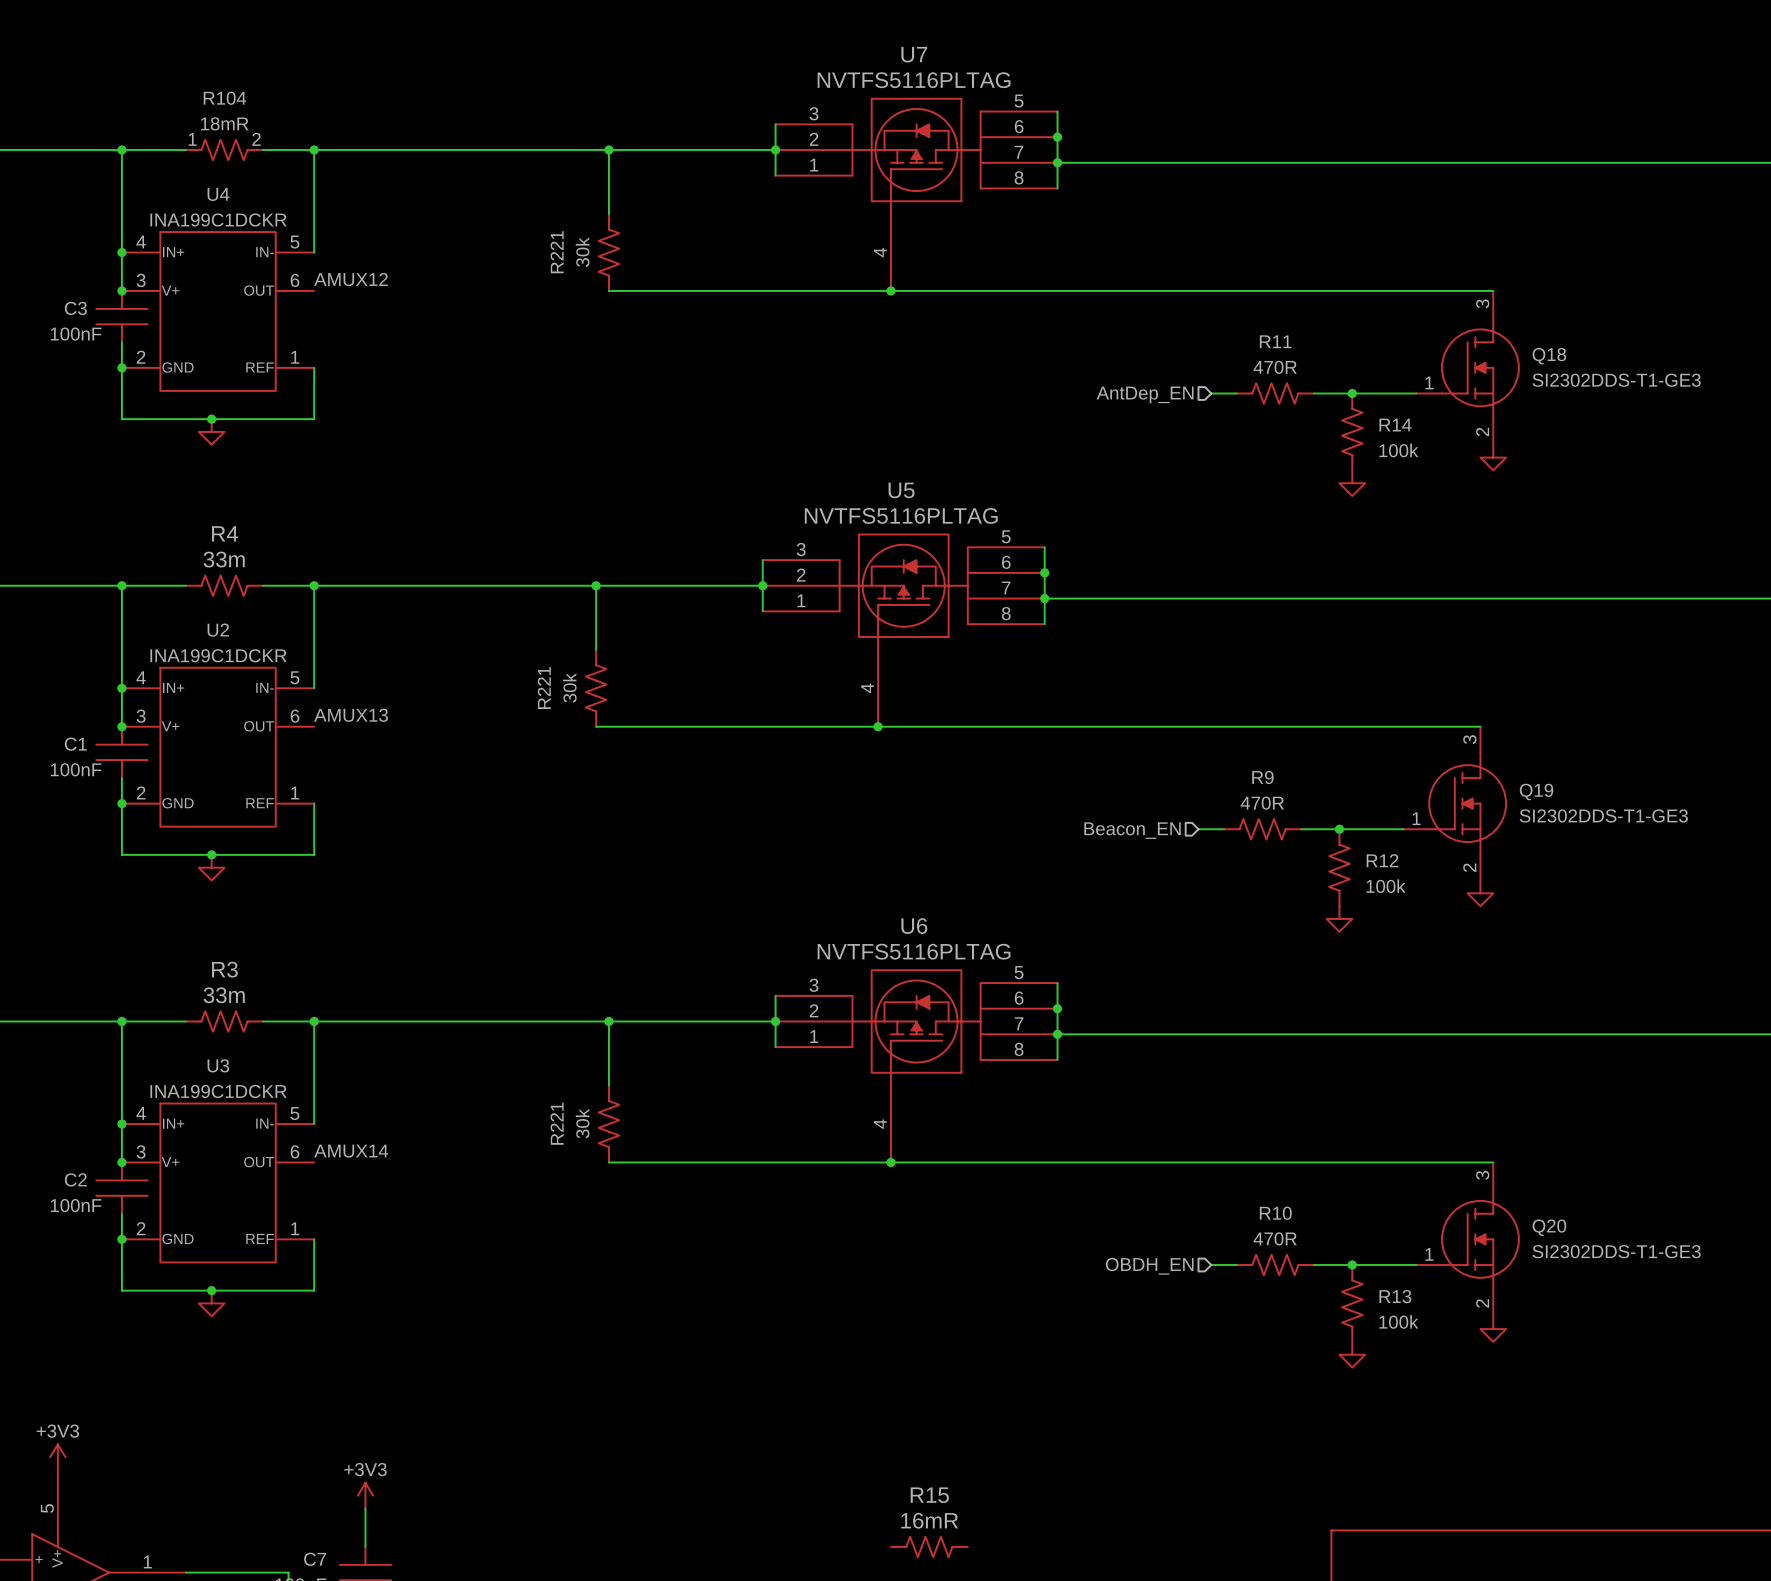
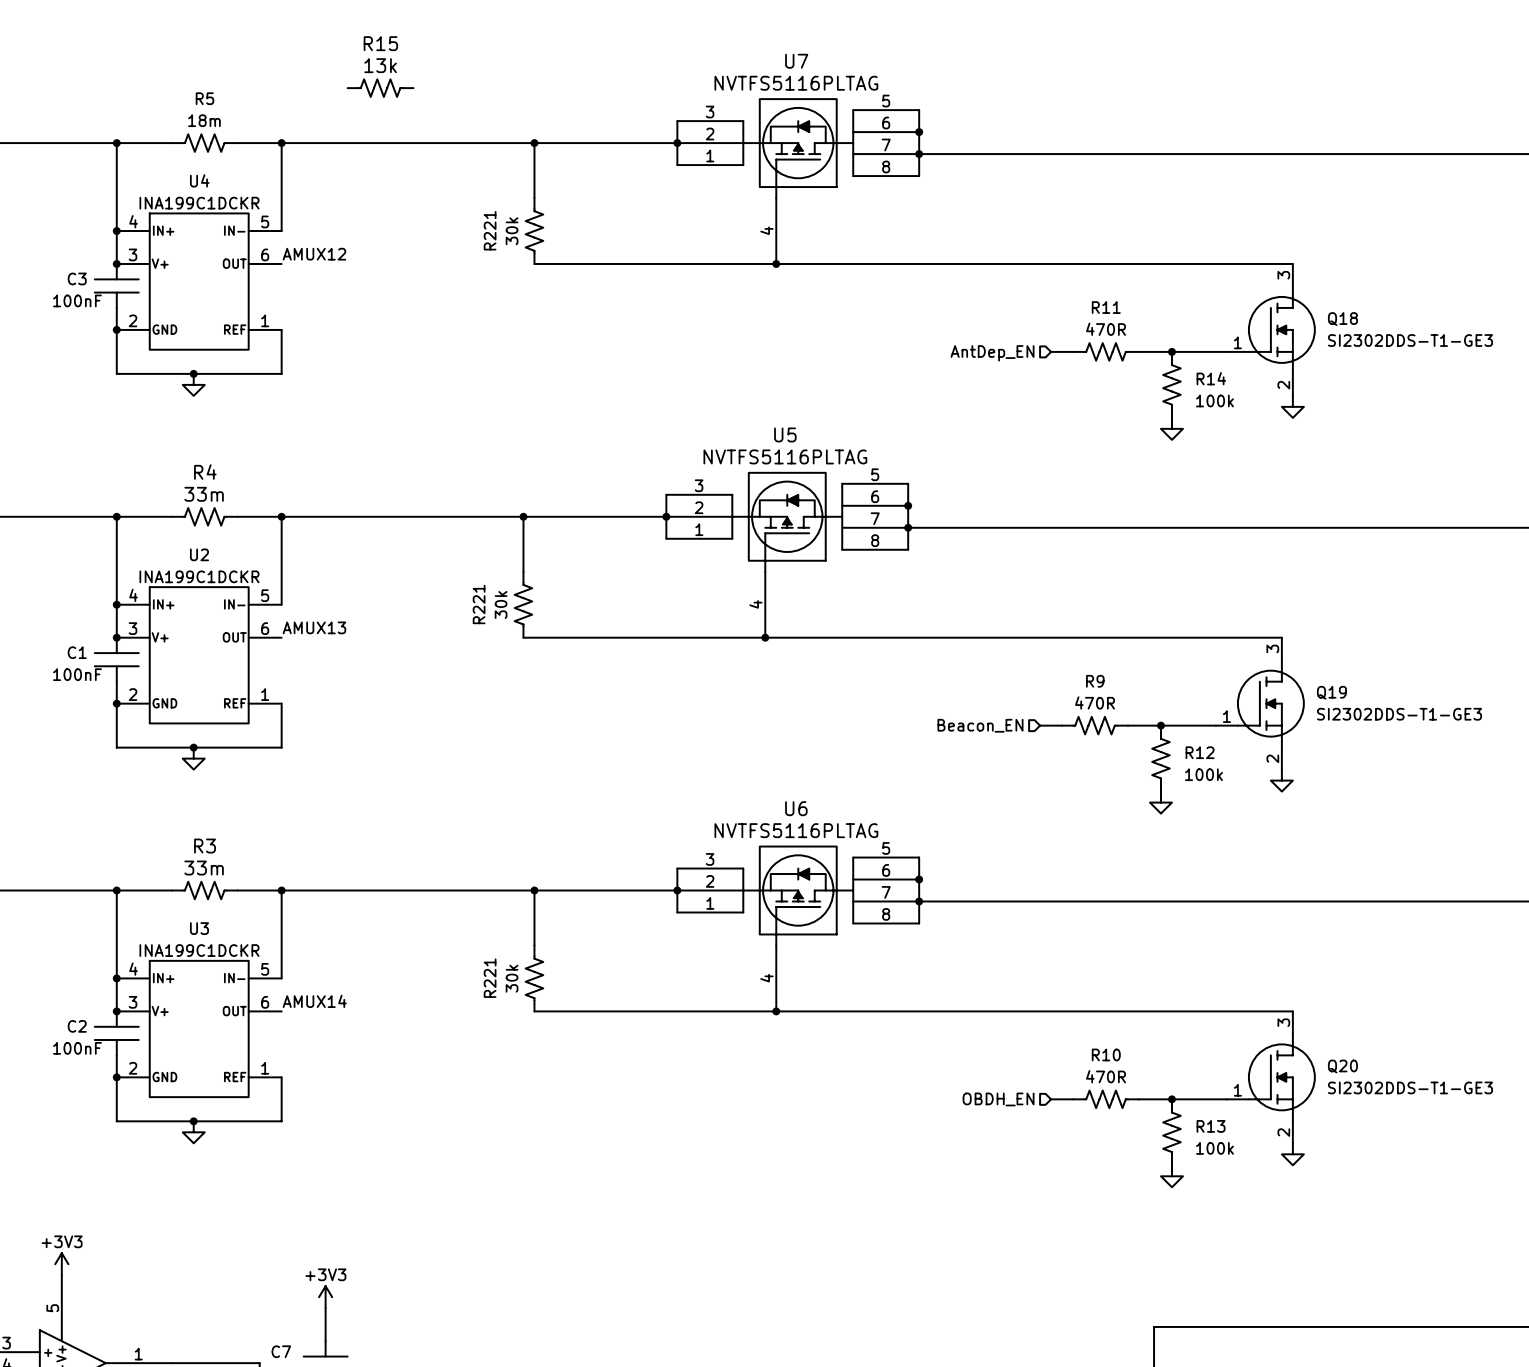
R104 name: R104 (224, 98) -> R5 (204, 98)
R104 value: 18mR (224, 123) -> 18m (204, 120)
R104 pin number: 1 (192, 139) -> none
R104 pin number: 2 (256, 139) -> none
R15 value: 16mR (929, 1520) -> 13k (380, 65)
R15 position: (929, 1546) -> (380, 88)

